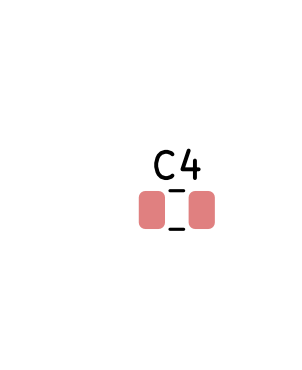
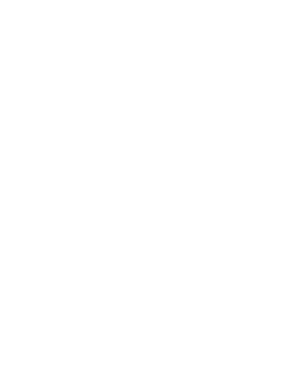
C4: (176, 209) -> none

